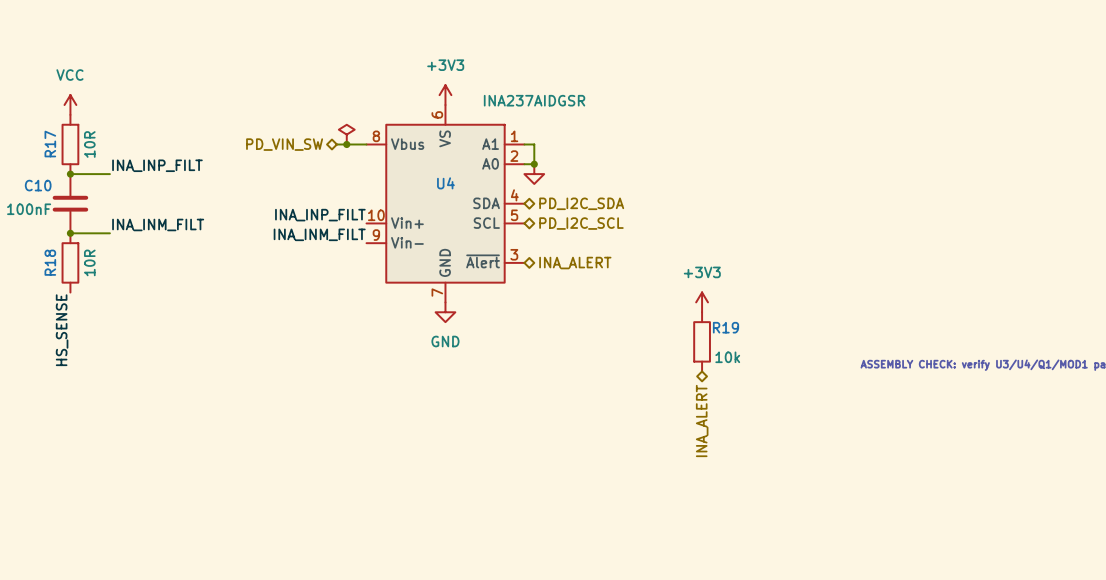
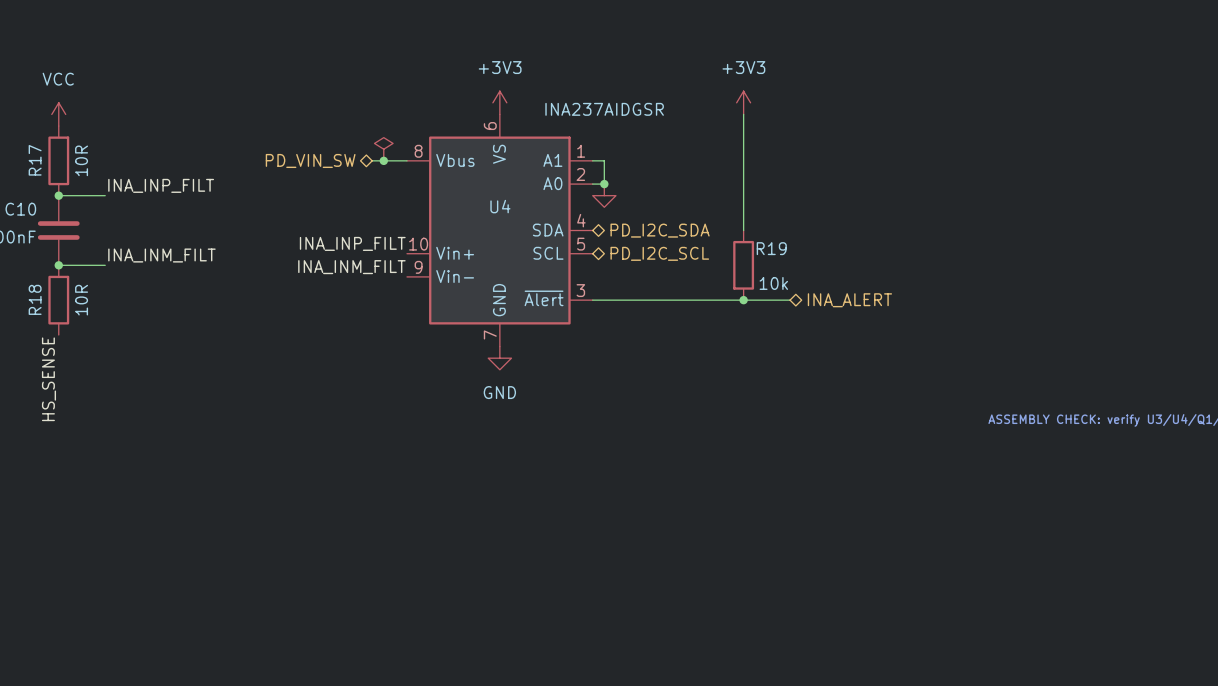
power symbol: none -> +3V3 (743, 102)
wire: none -> (743, 114) (743, 230)
wire: none -> (592, 300) (790, 300)
junction: none -> (743, 300)
hierarchical label: INA_ALERT (575, 263) -> none
hierarchical label: none -> INA_ALERT (849, 300)
power symbol: +3V3 (702, 302) -> none
R19 position: (702, 341) -> (743, 265)
hierarchical label: INA_ALERT (702, 420) -> none

